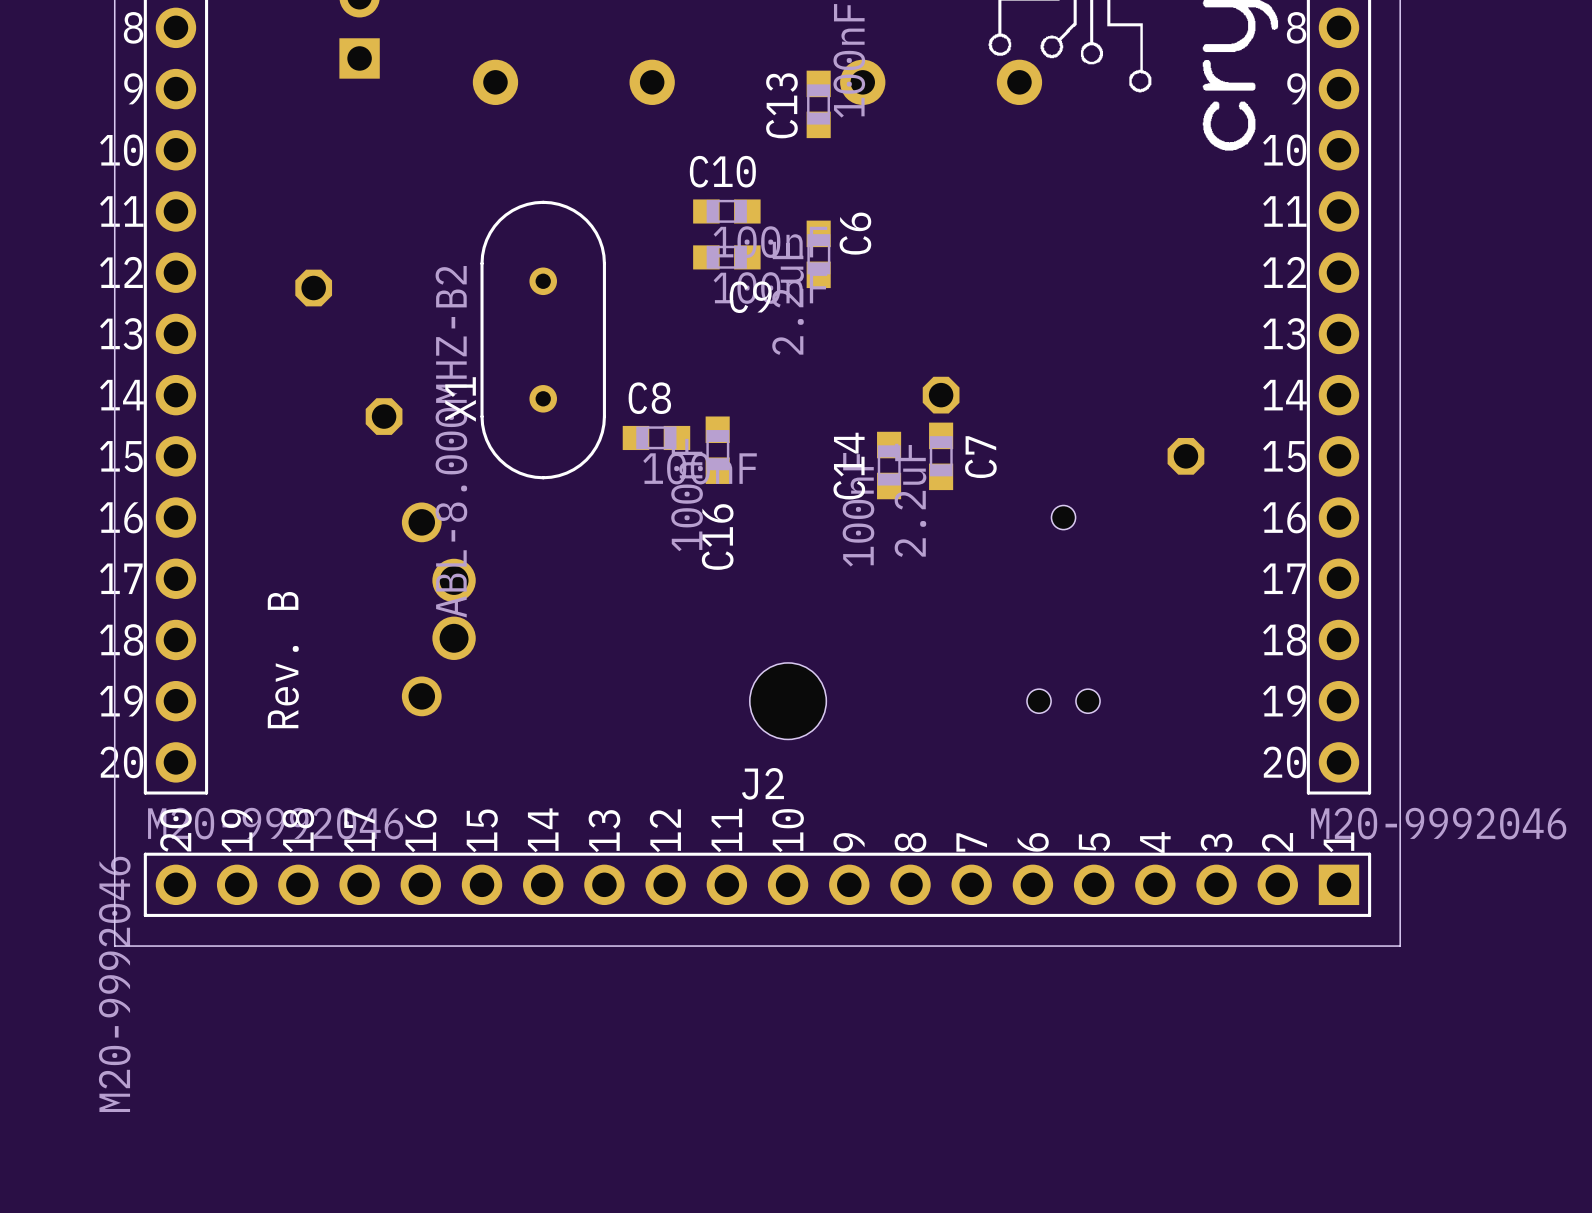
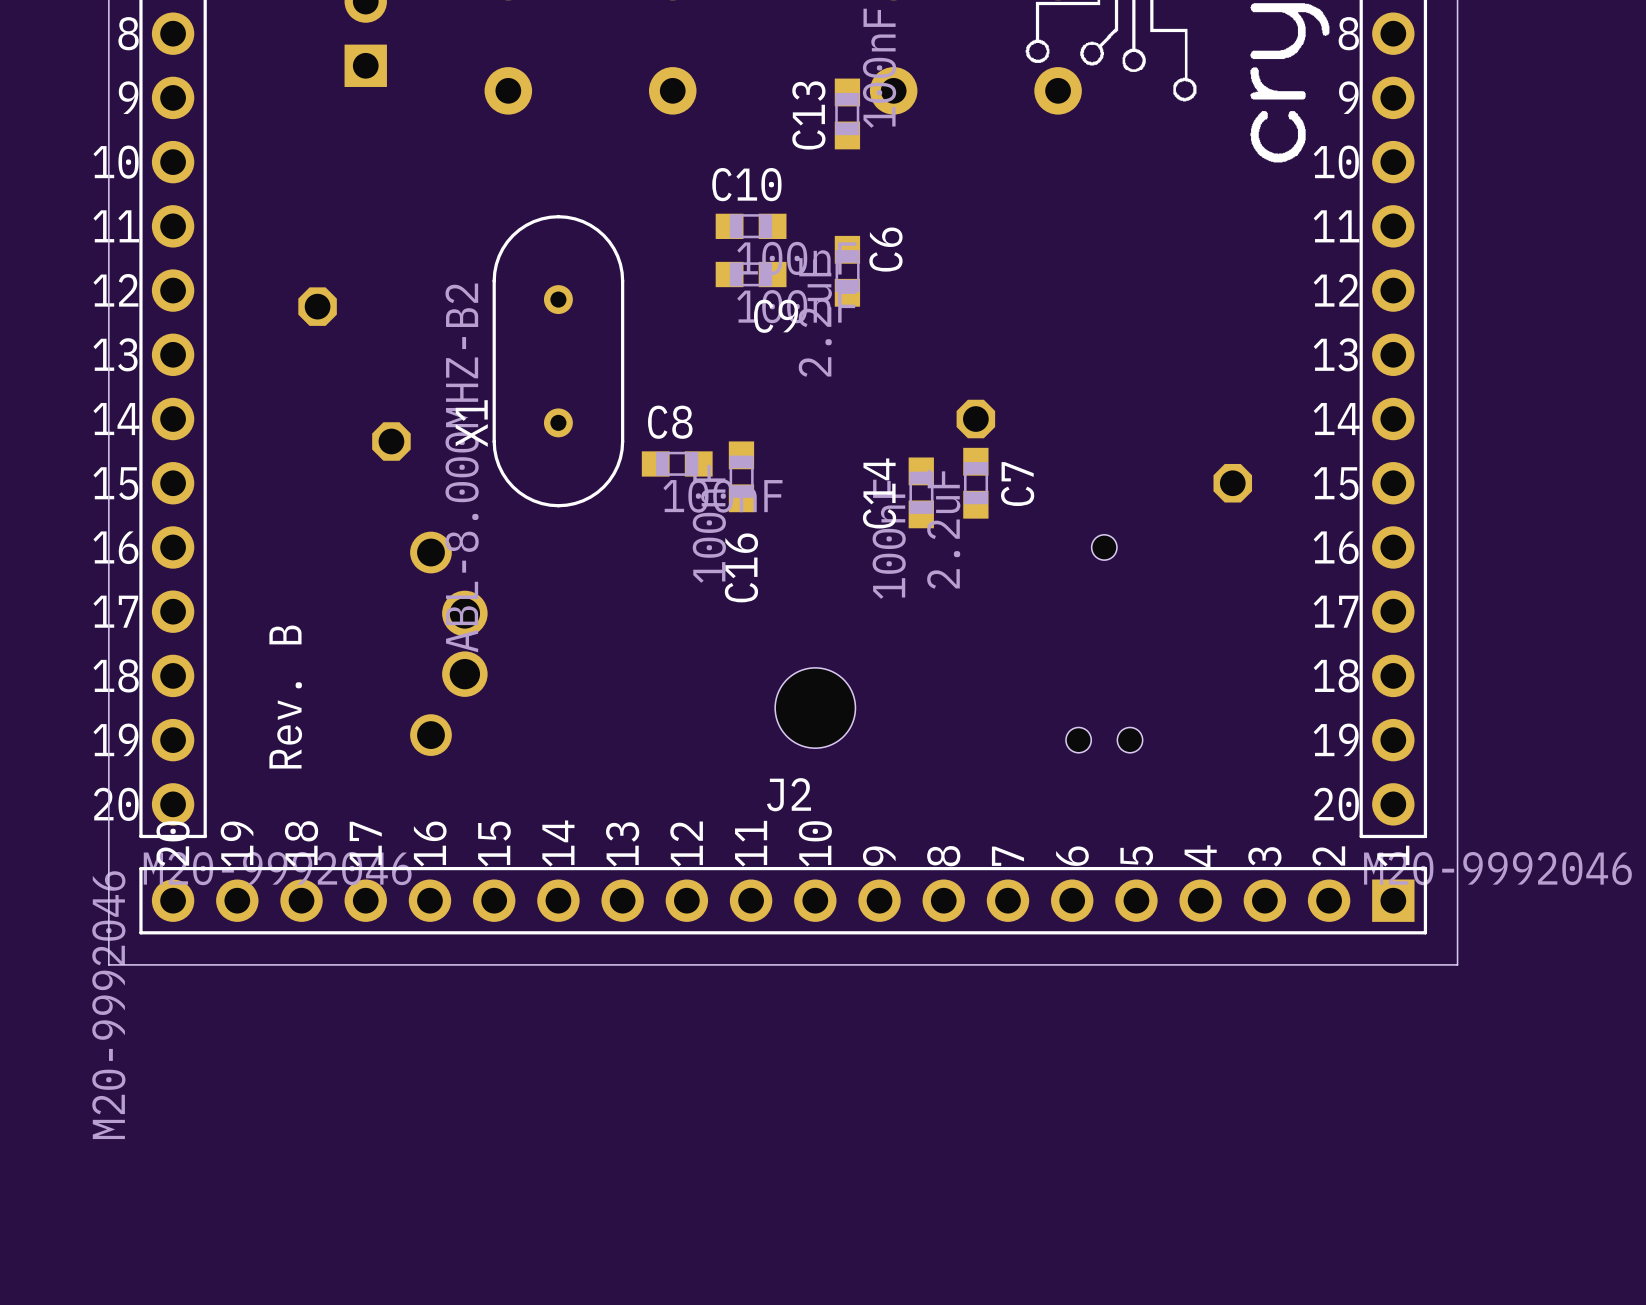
part position: (788, 701) -> (815, 708)
J2 position: (757, 884) -> (783, 900)
board edge: (1400, 915) (1400, 946) (114, 946) (114, 915) -> (1457, 964) (108, 964)

